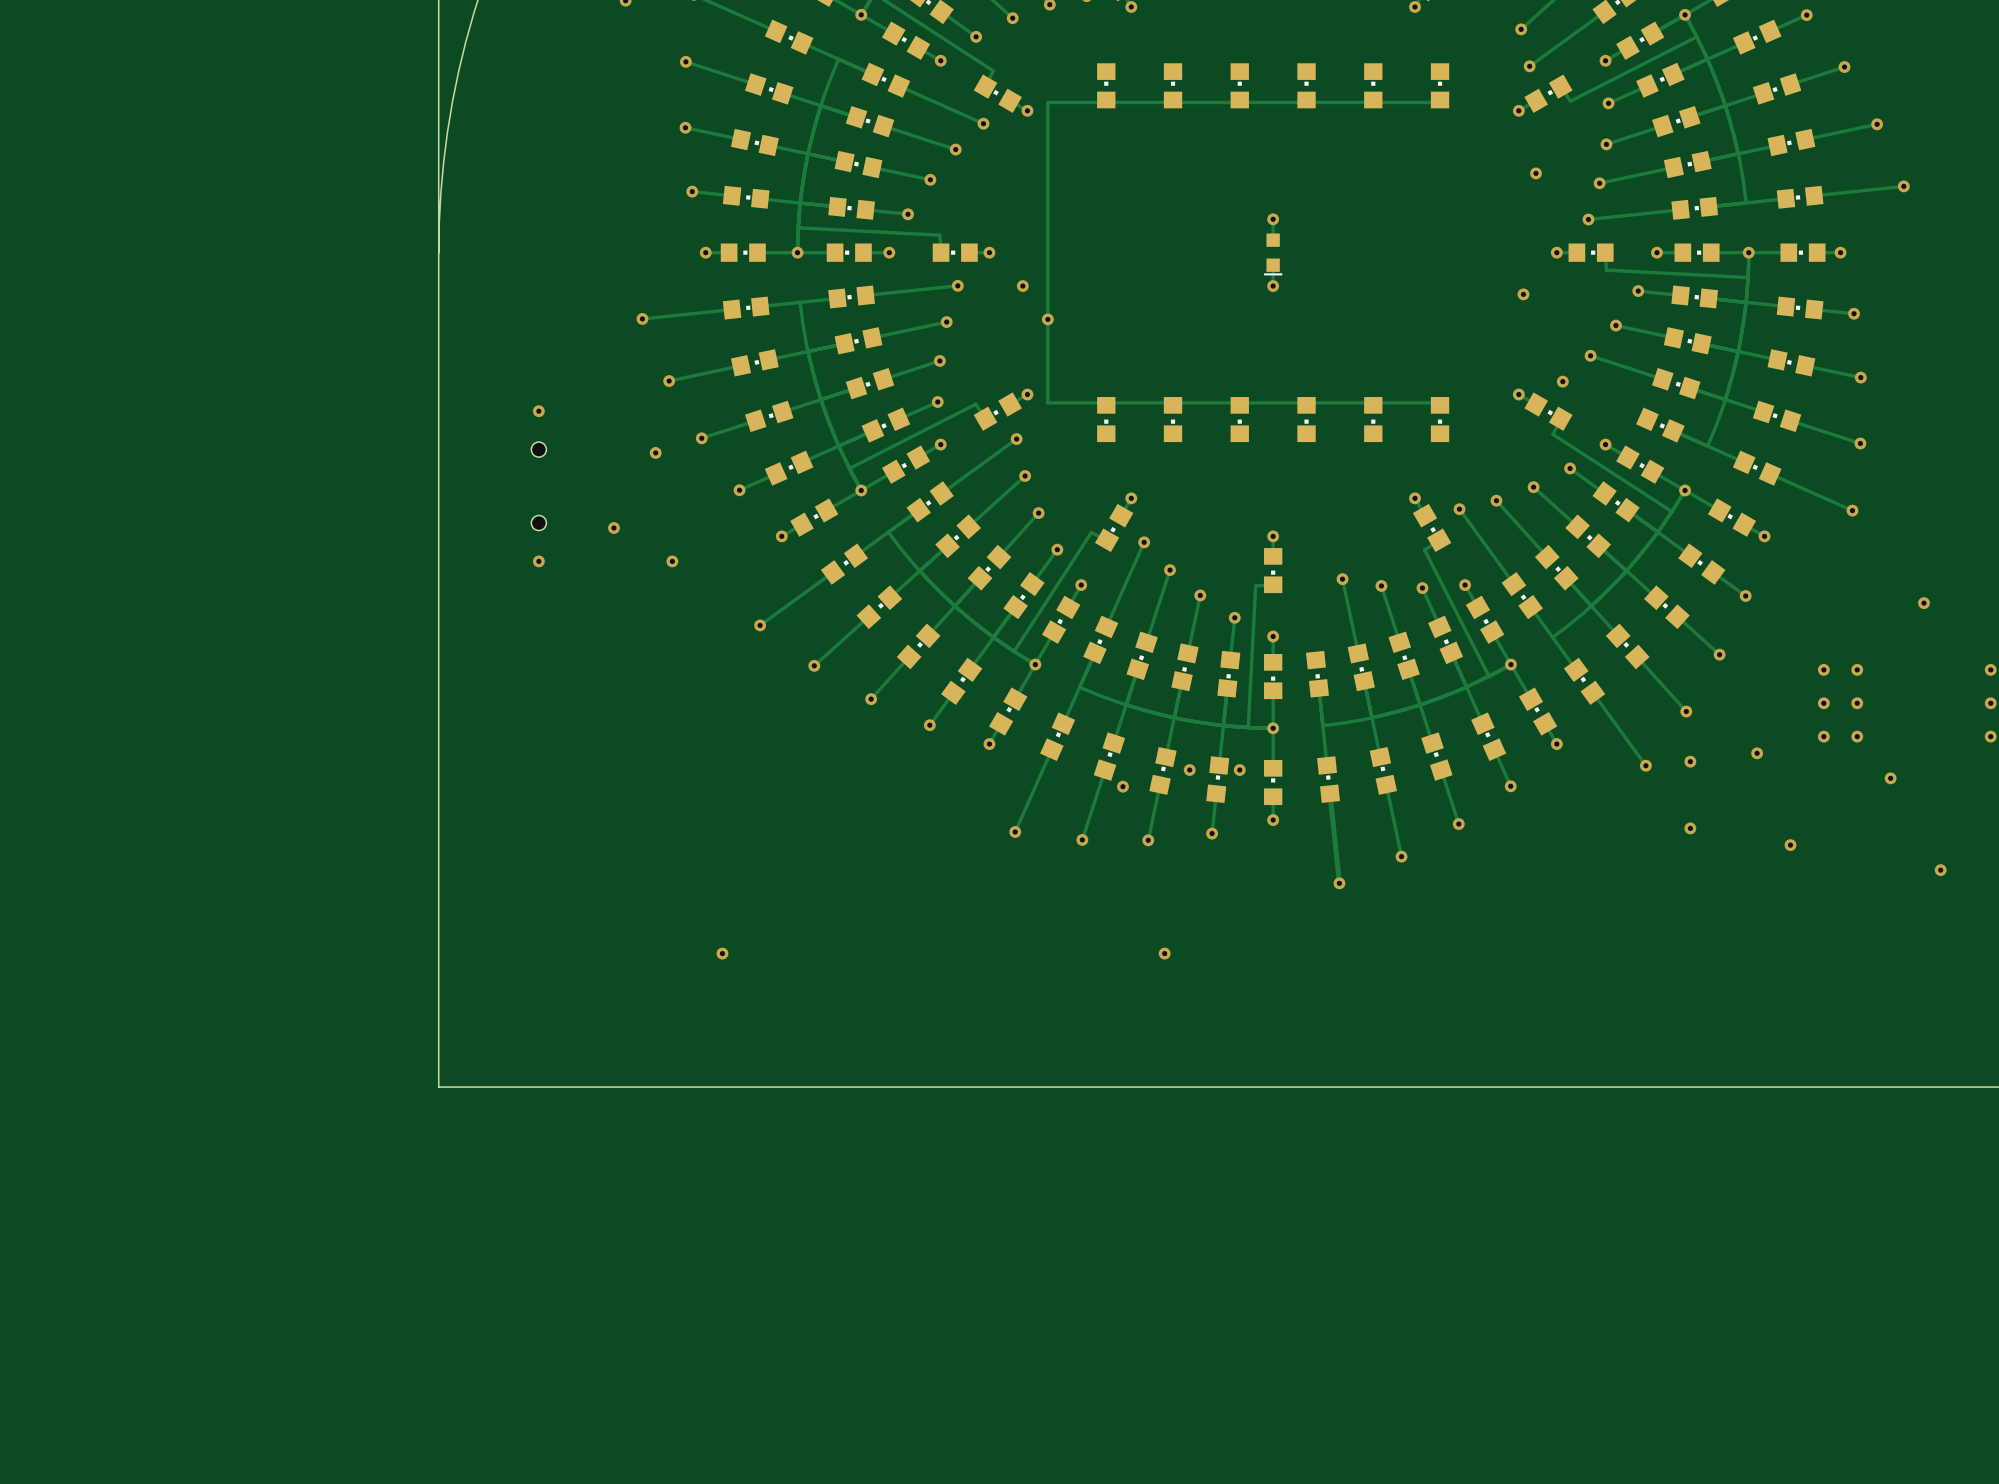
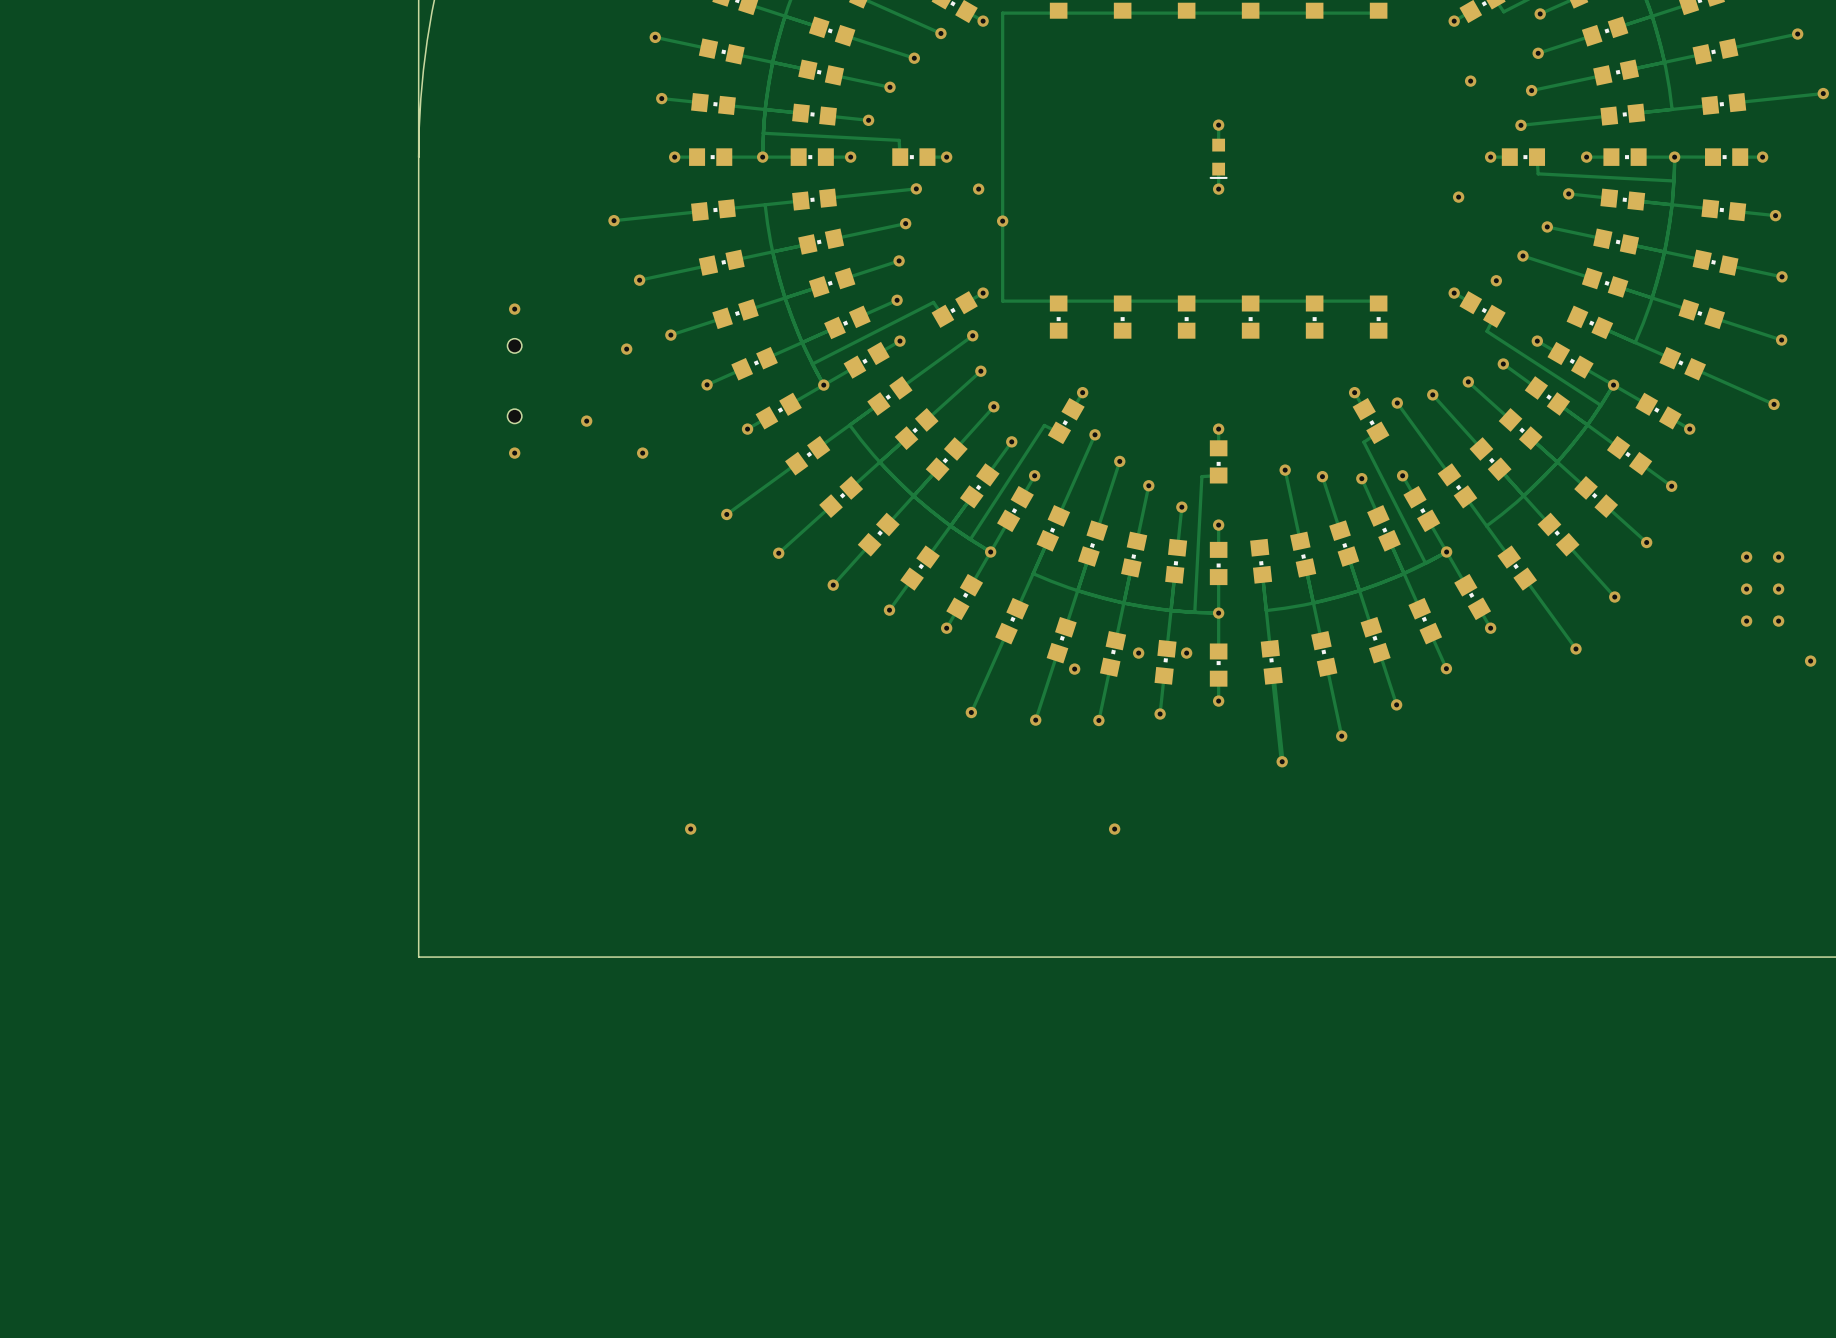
via: (1757, 753) -> none
via: (1690, 761) -> none
via: (1690, 828) -> none
via: (1790, 845) -> none

